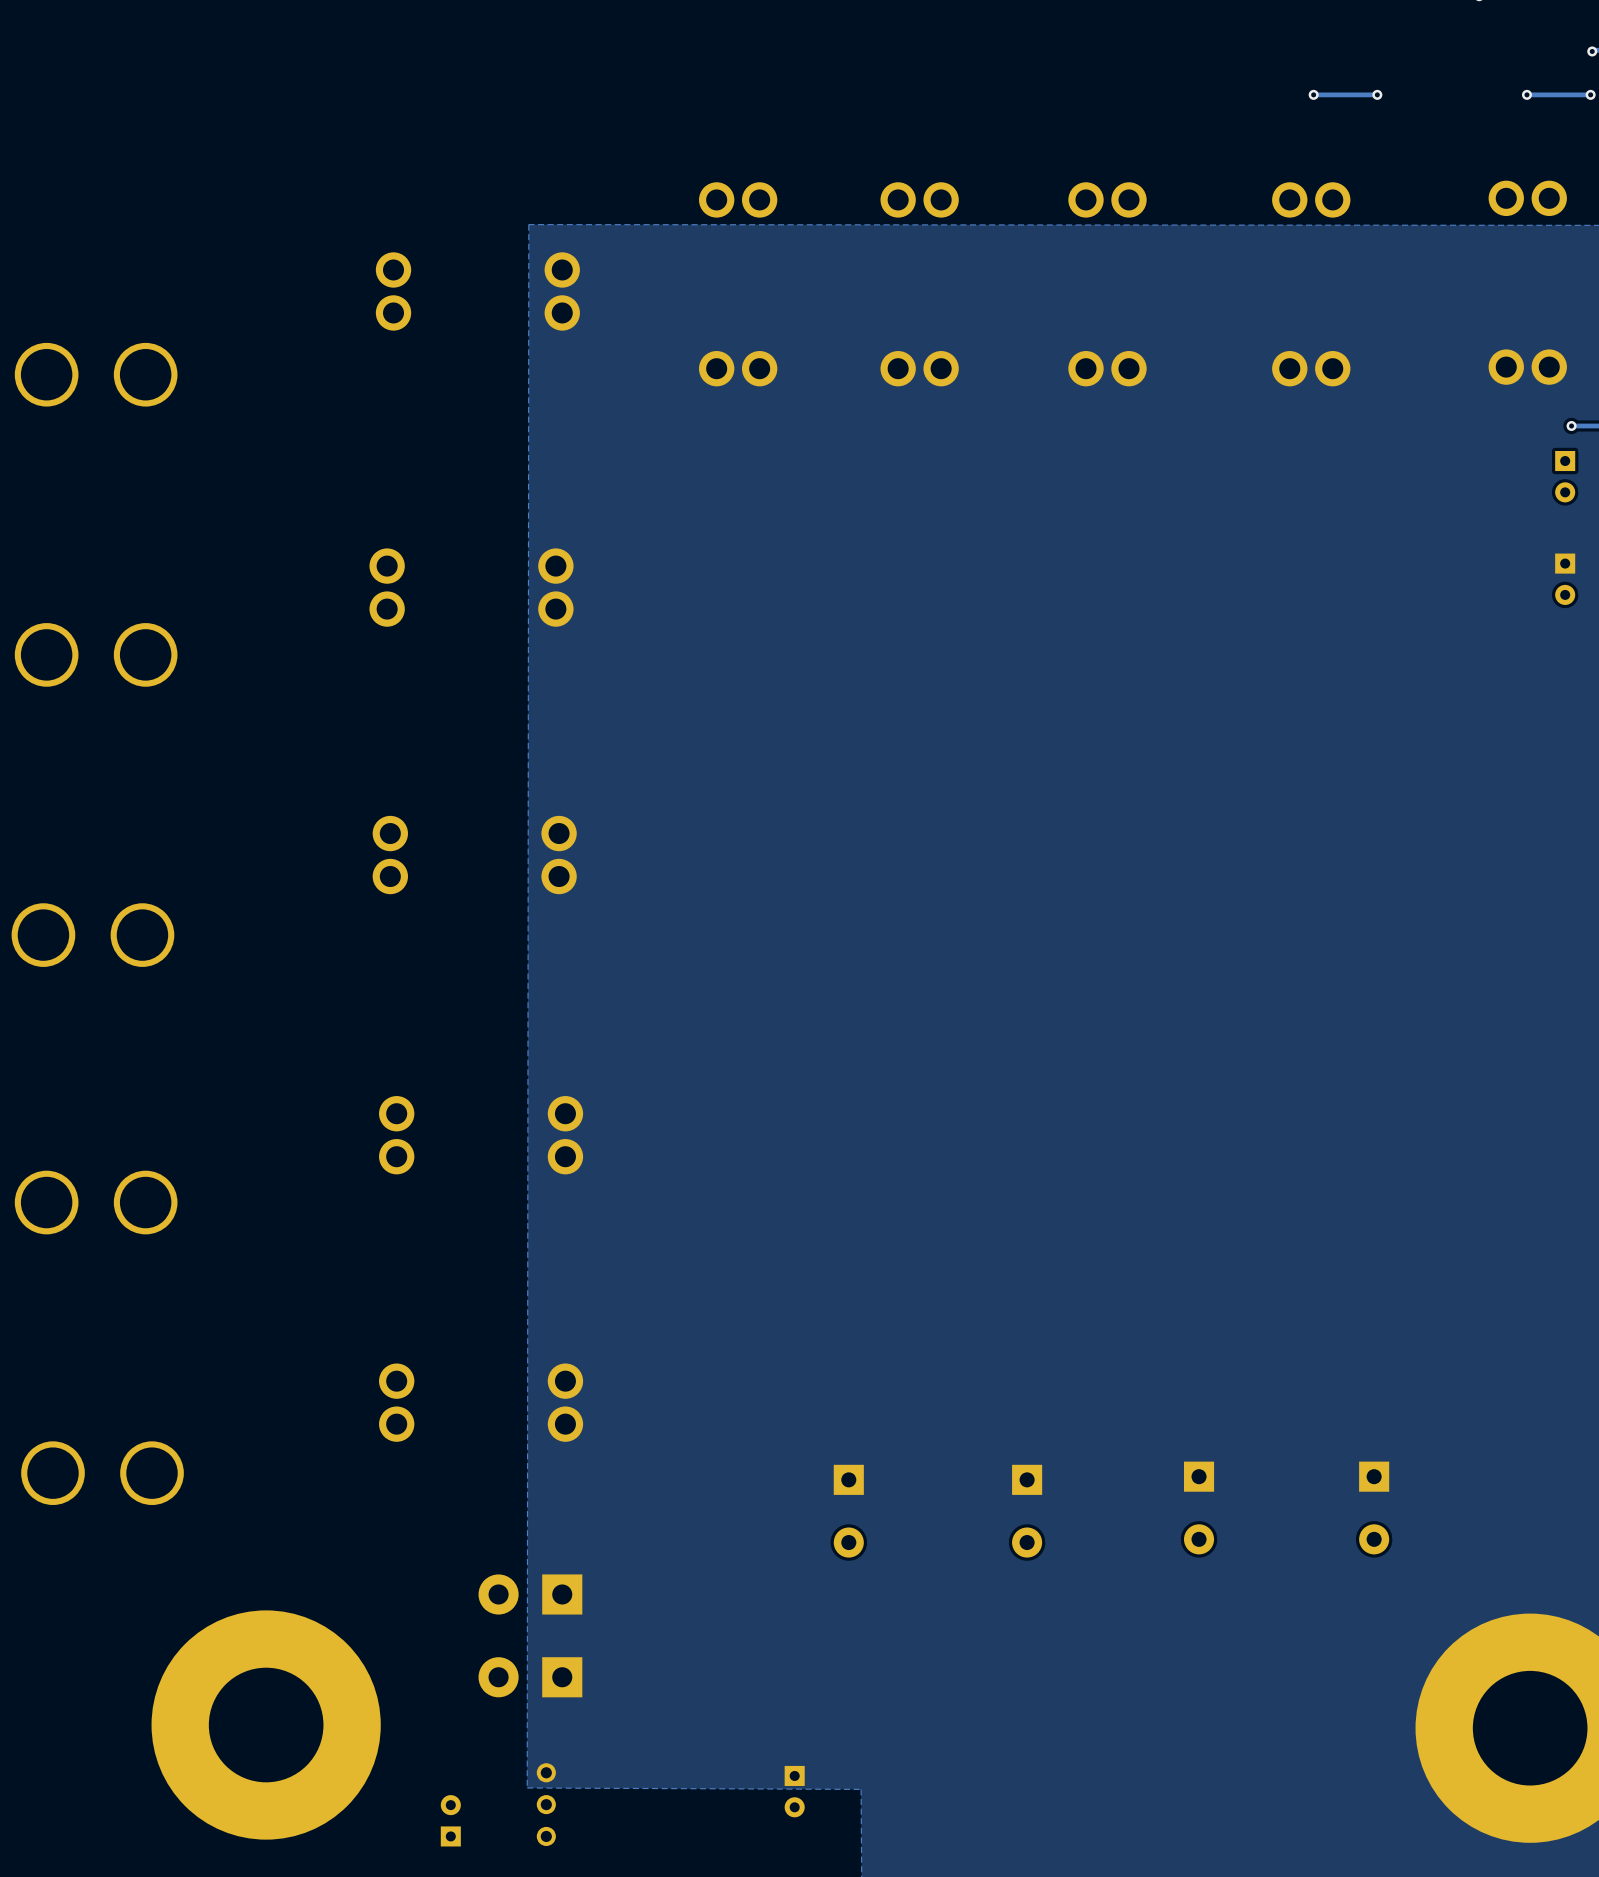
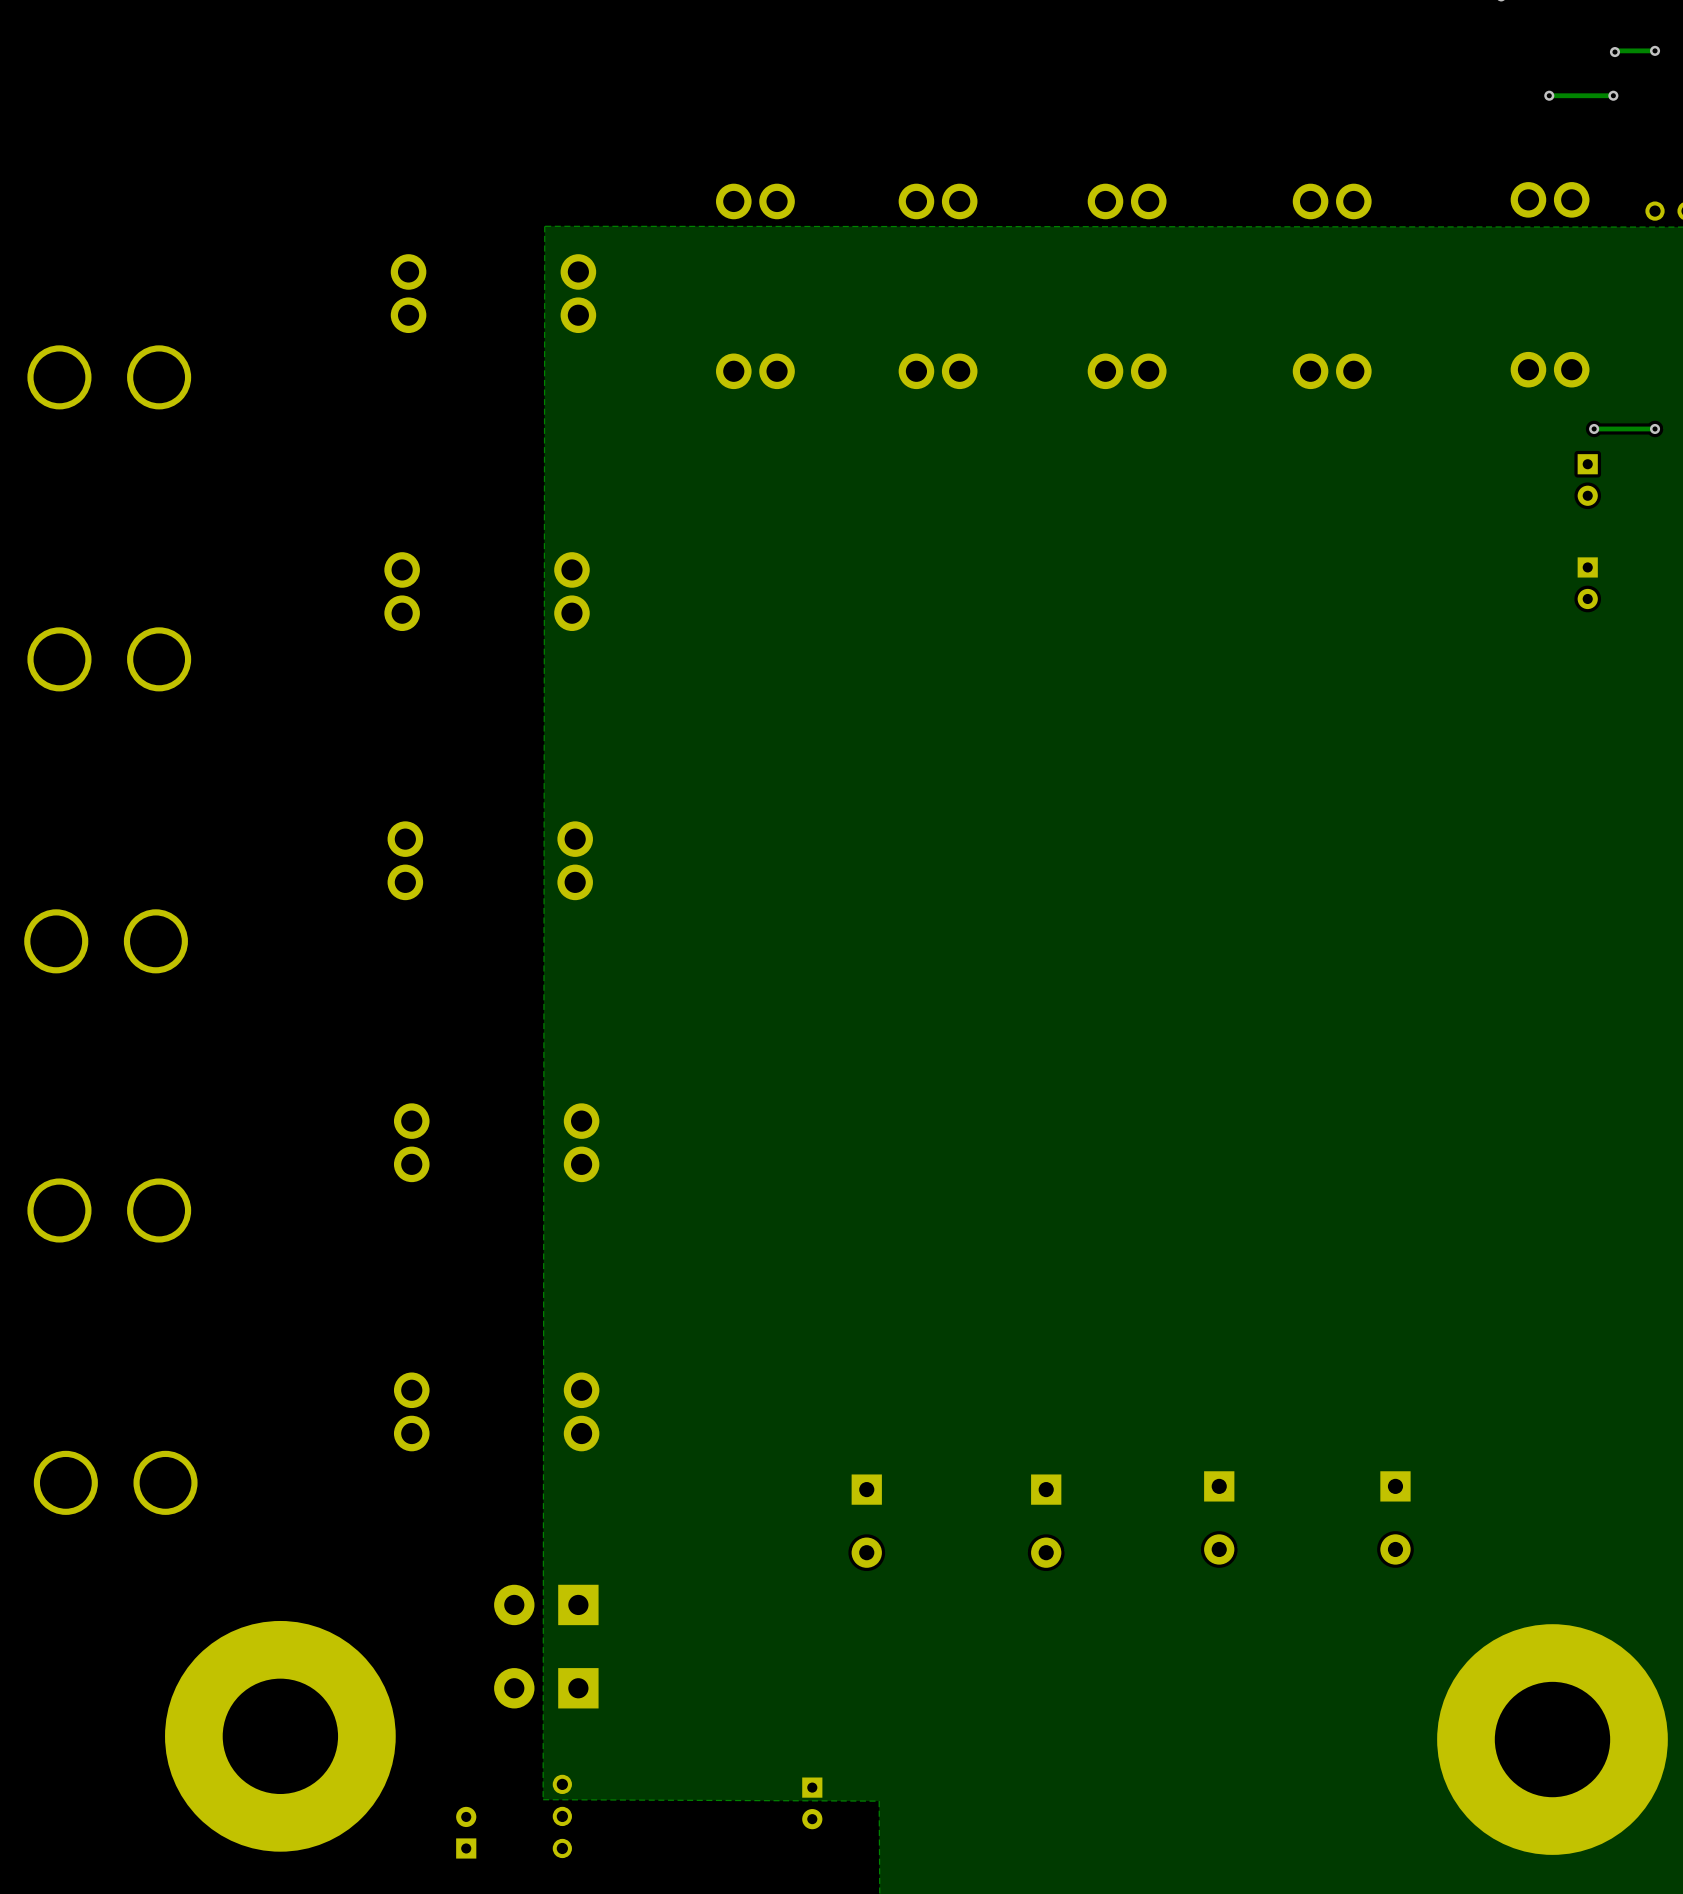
via: (1313, 94) -> none
track: (1377, 94) (1313, 94) -> none
via: (1377, 94) -> none

